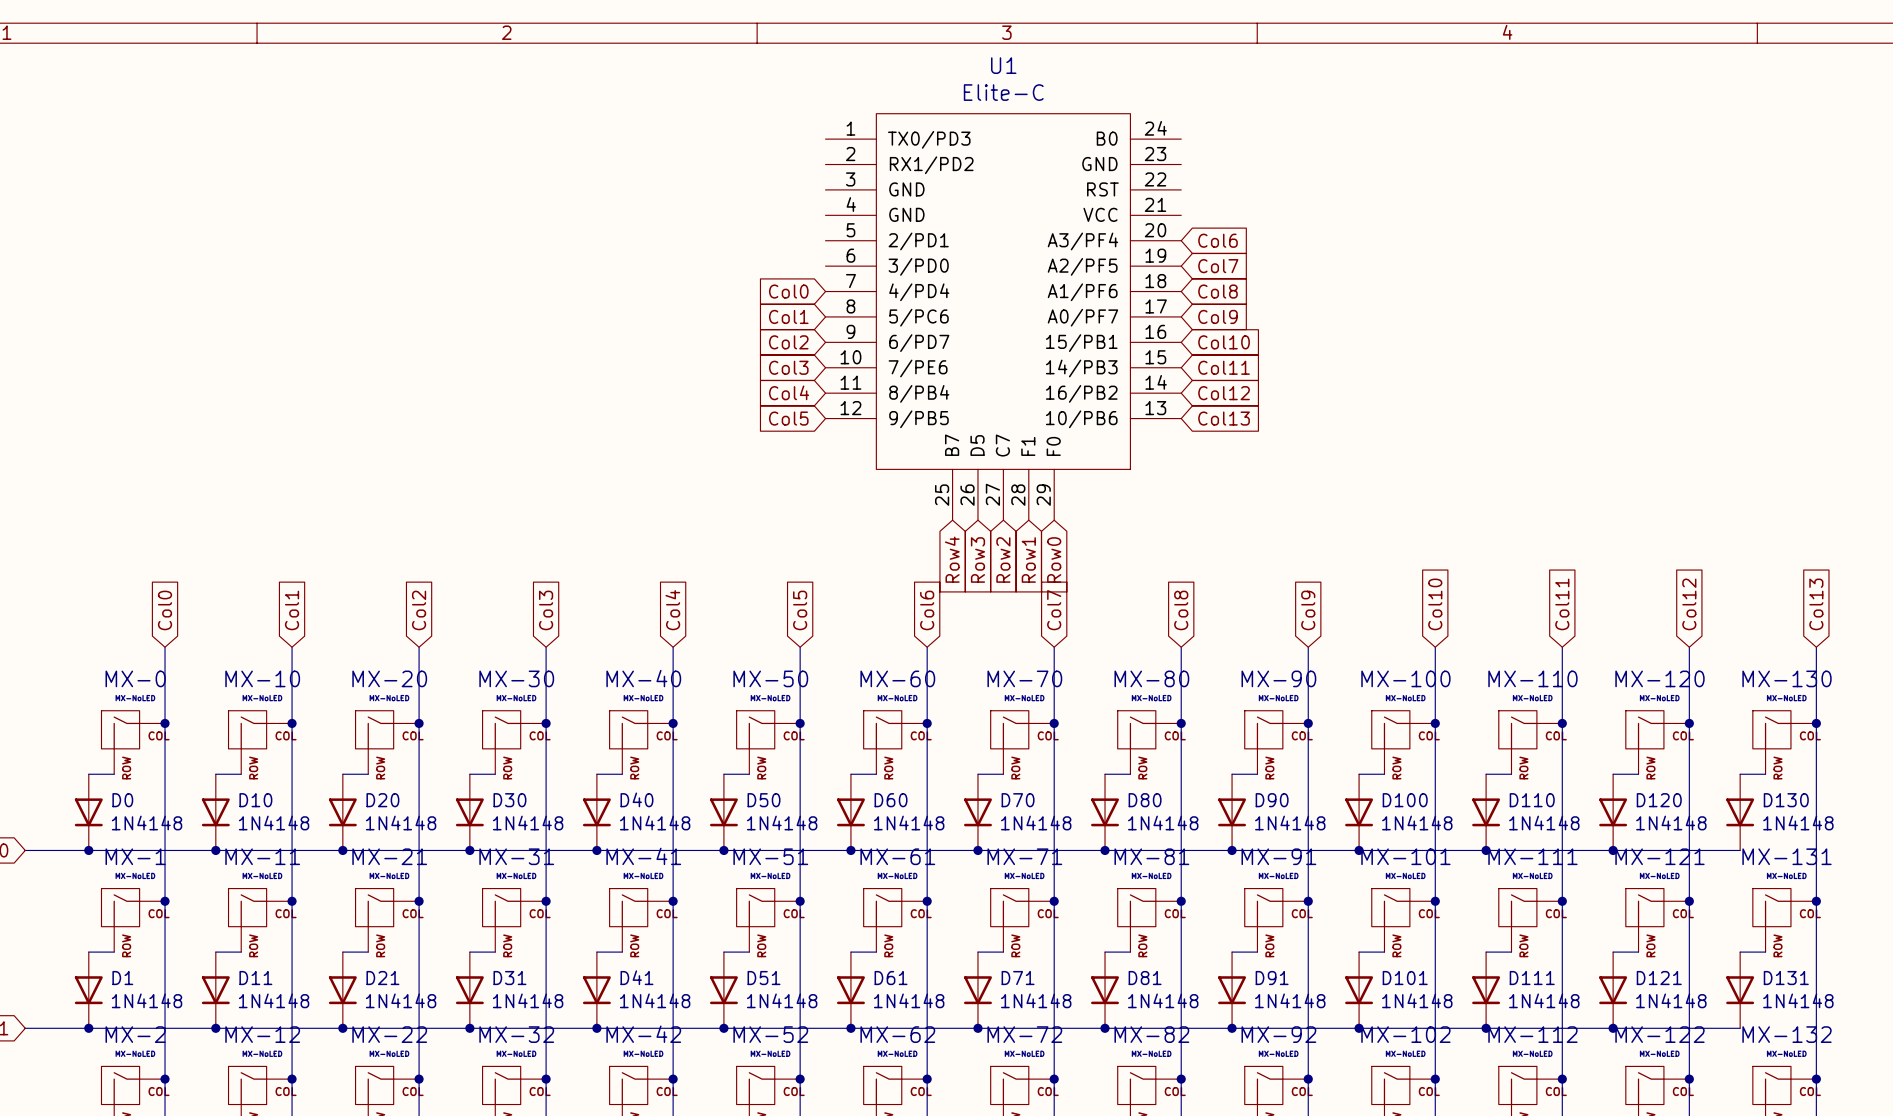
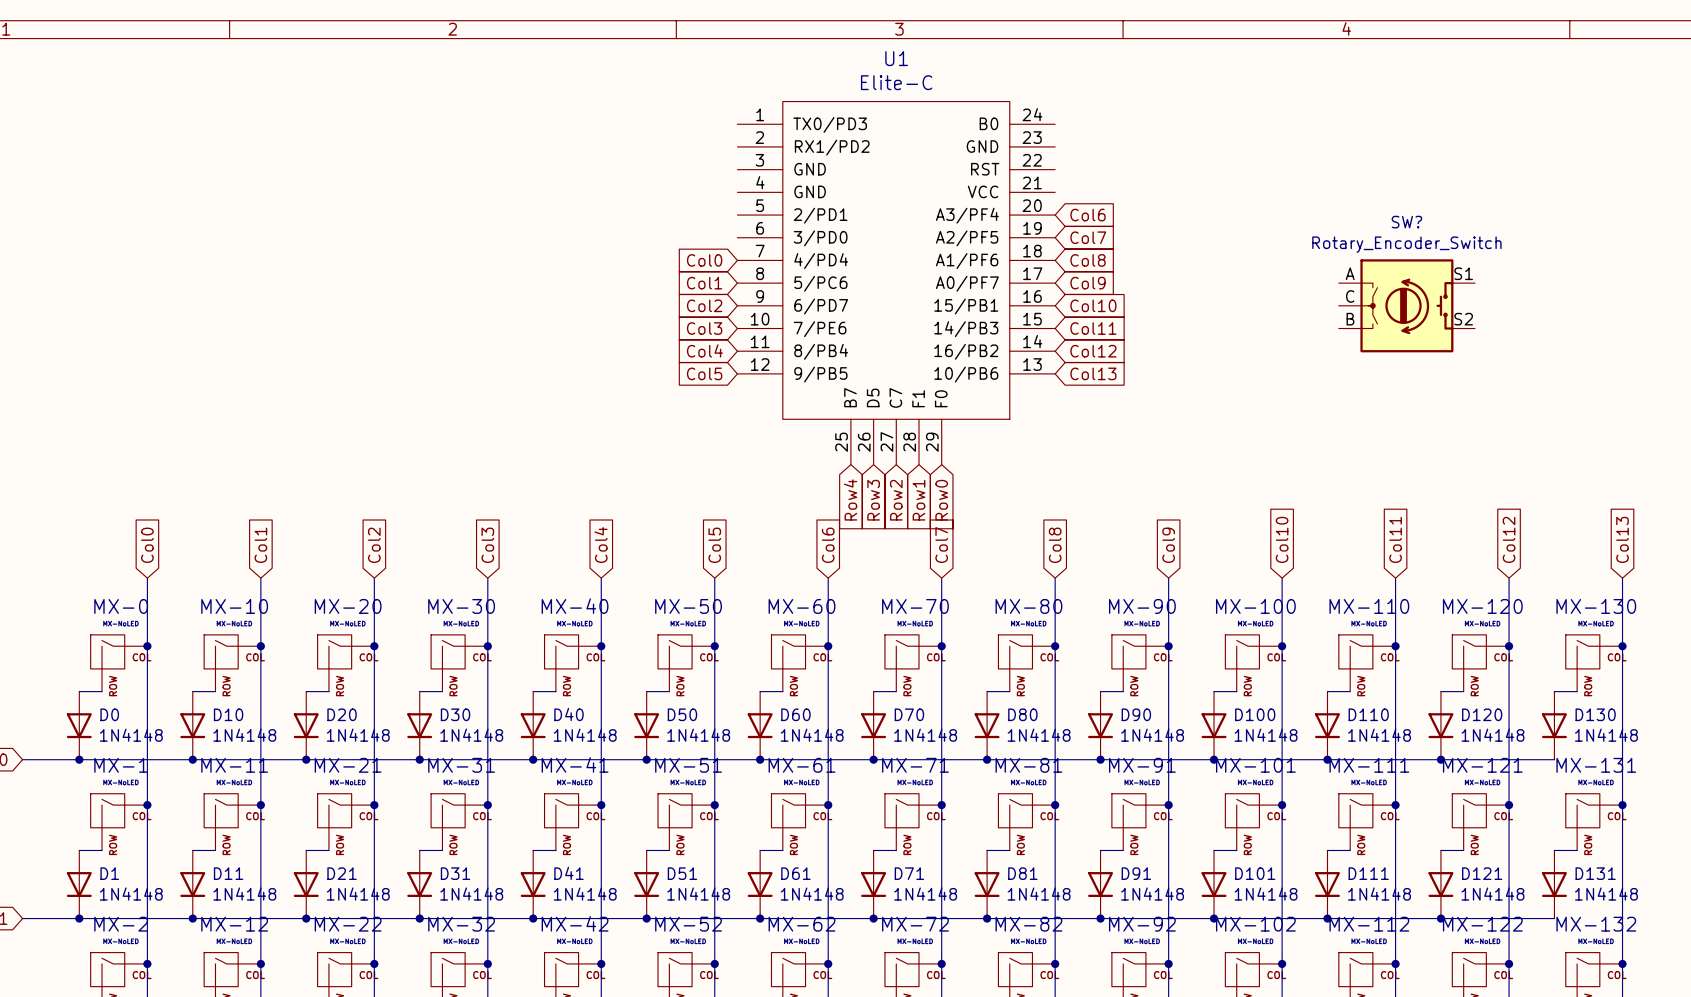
SW?: none -> Rotary_Encoder_Switch (1406, 305)

